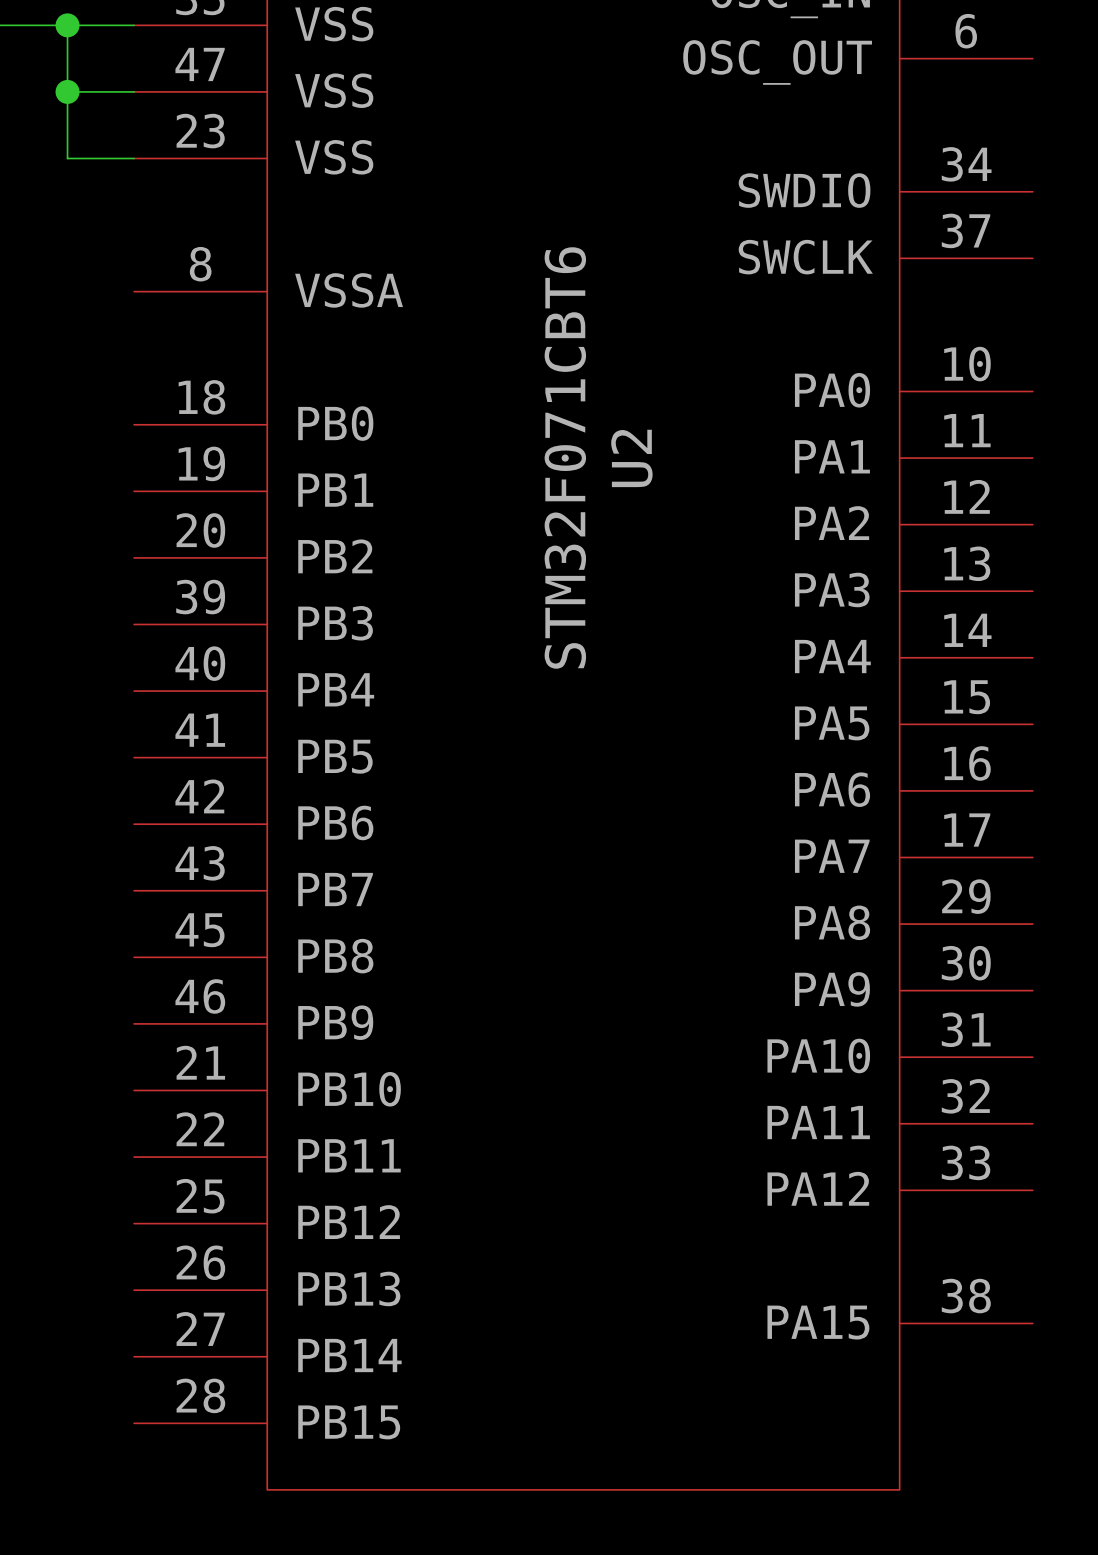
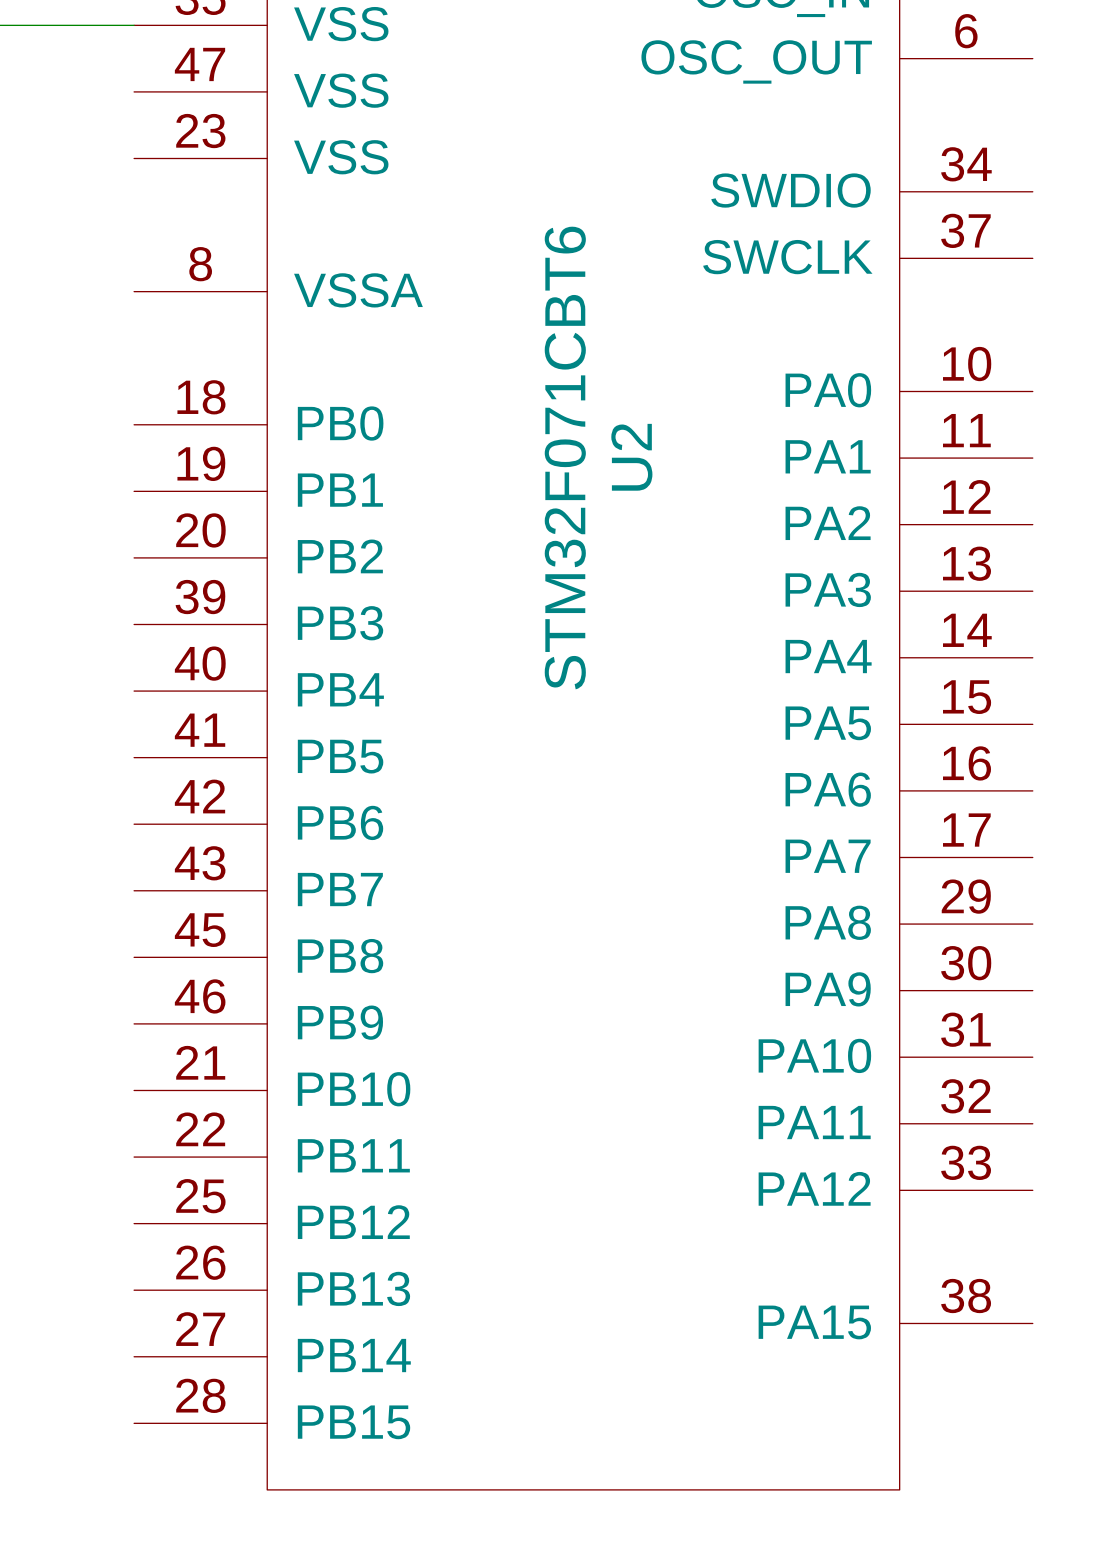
wire: (67, 25) (67, 158) (134, 158) -> none
junction: (67, 25) -> none
wire: (67, 91) (134, 91) -> none
junction: (67, 91) -> none

